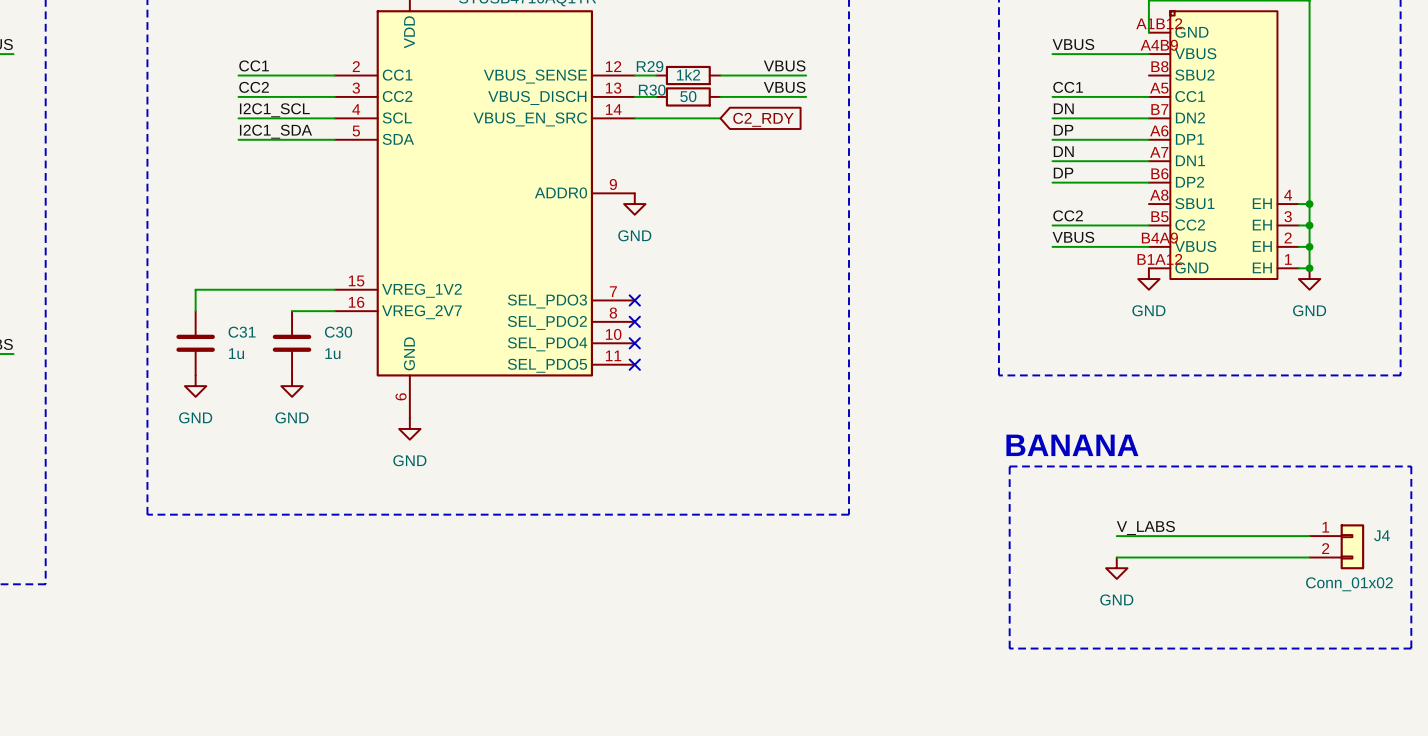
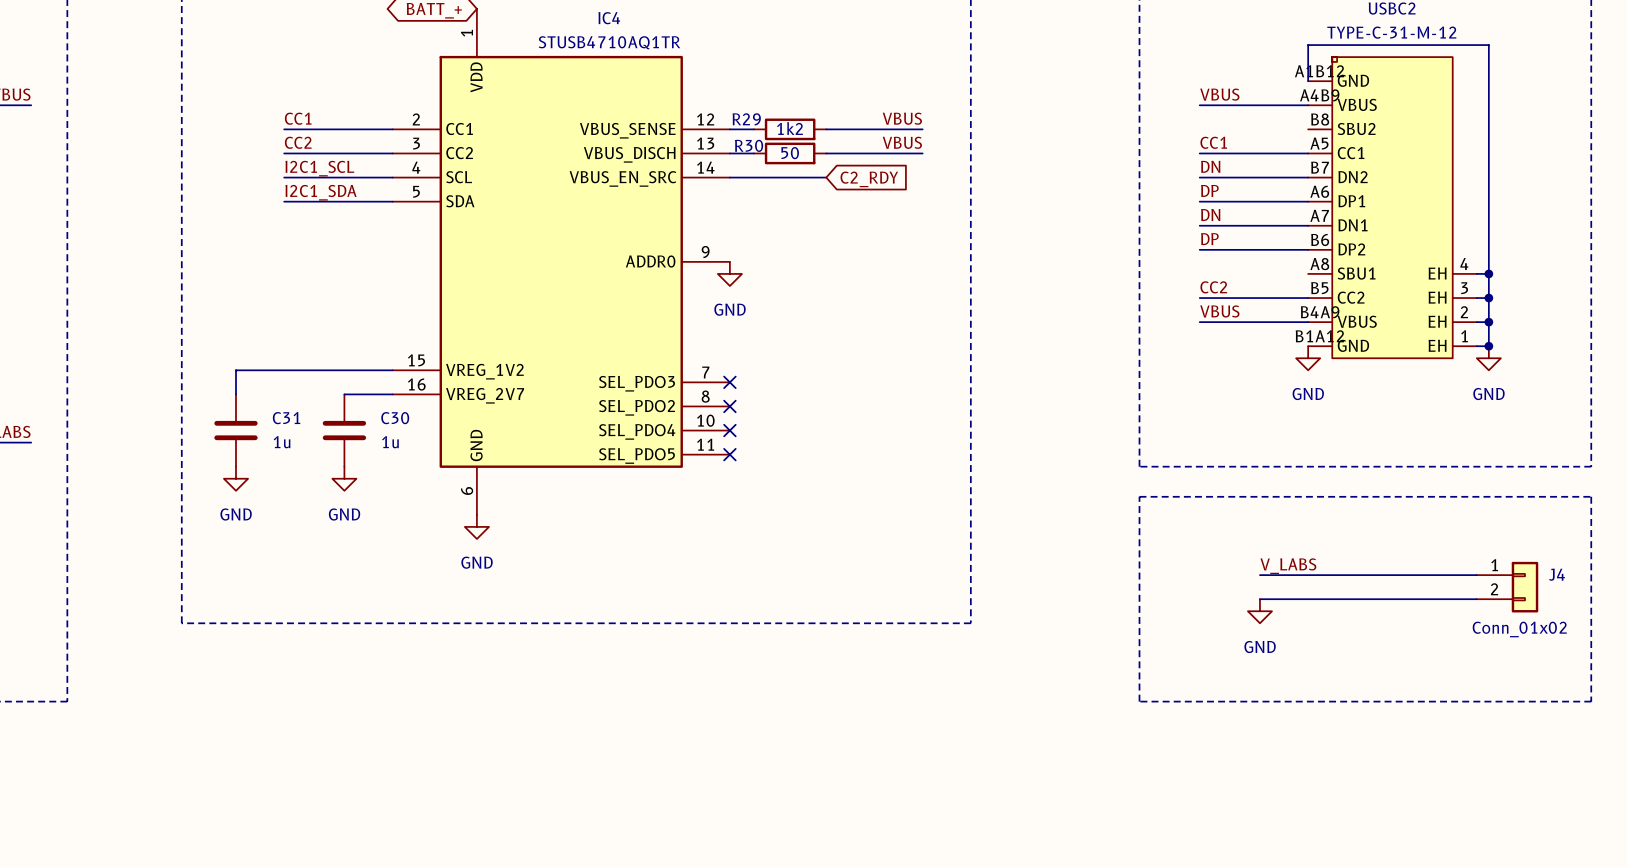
text: BANANA (1072, 445) -> none
line: (1009, 466) (1411, 466) (1411, 648) (1009, 648) (1009, 466) -> (1139, 496) (1591, 496) (1591, 701) (1139, 701) (1139, 496)
label position: V_LABS (1145, 528) -> V_LABS (1288, 566)
wire: (1116, 536) (1309, 536) -> (1259, 599) (1476, 599)
J4 position: (1336, 546) -> (1507, 587)
wire: (1116, 557) (1309, 557) -> (1259, 575) (1476, 575)
power symbol position: GND (1116, 568) -> GND (1259, 611)

